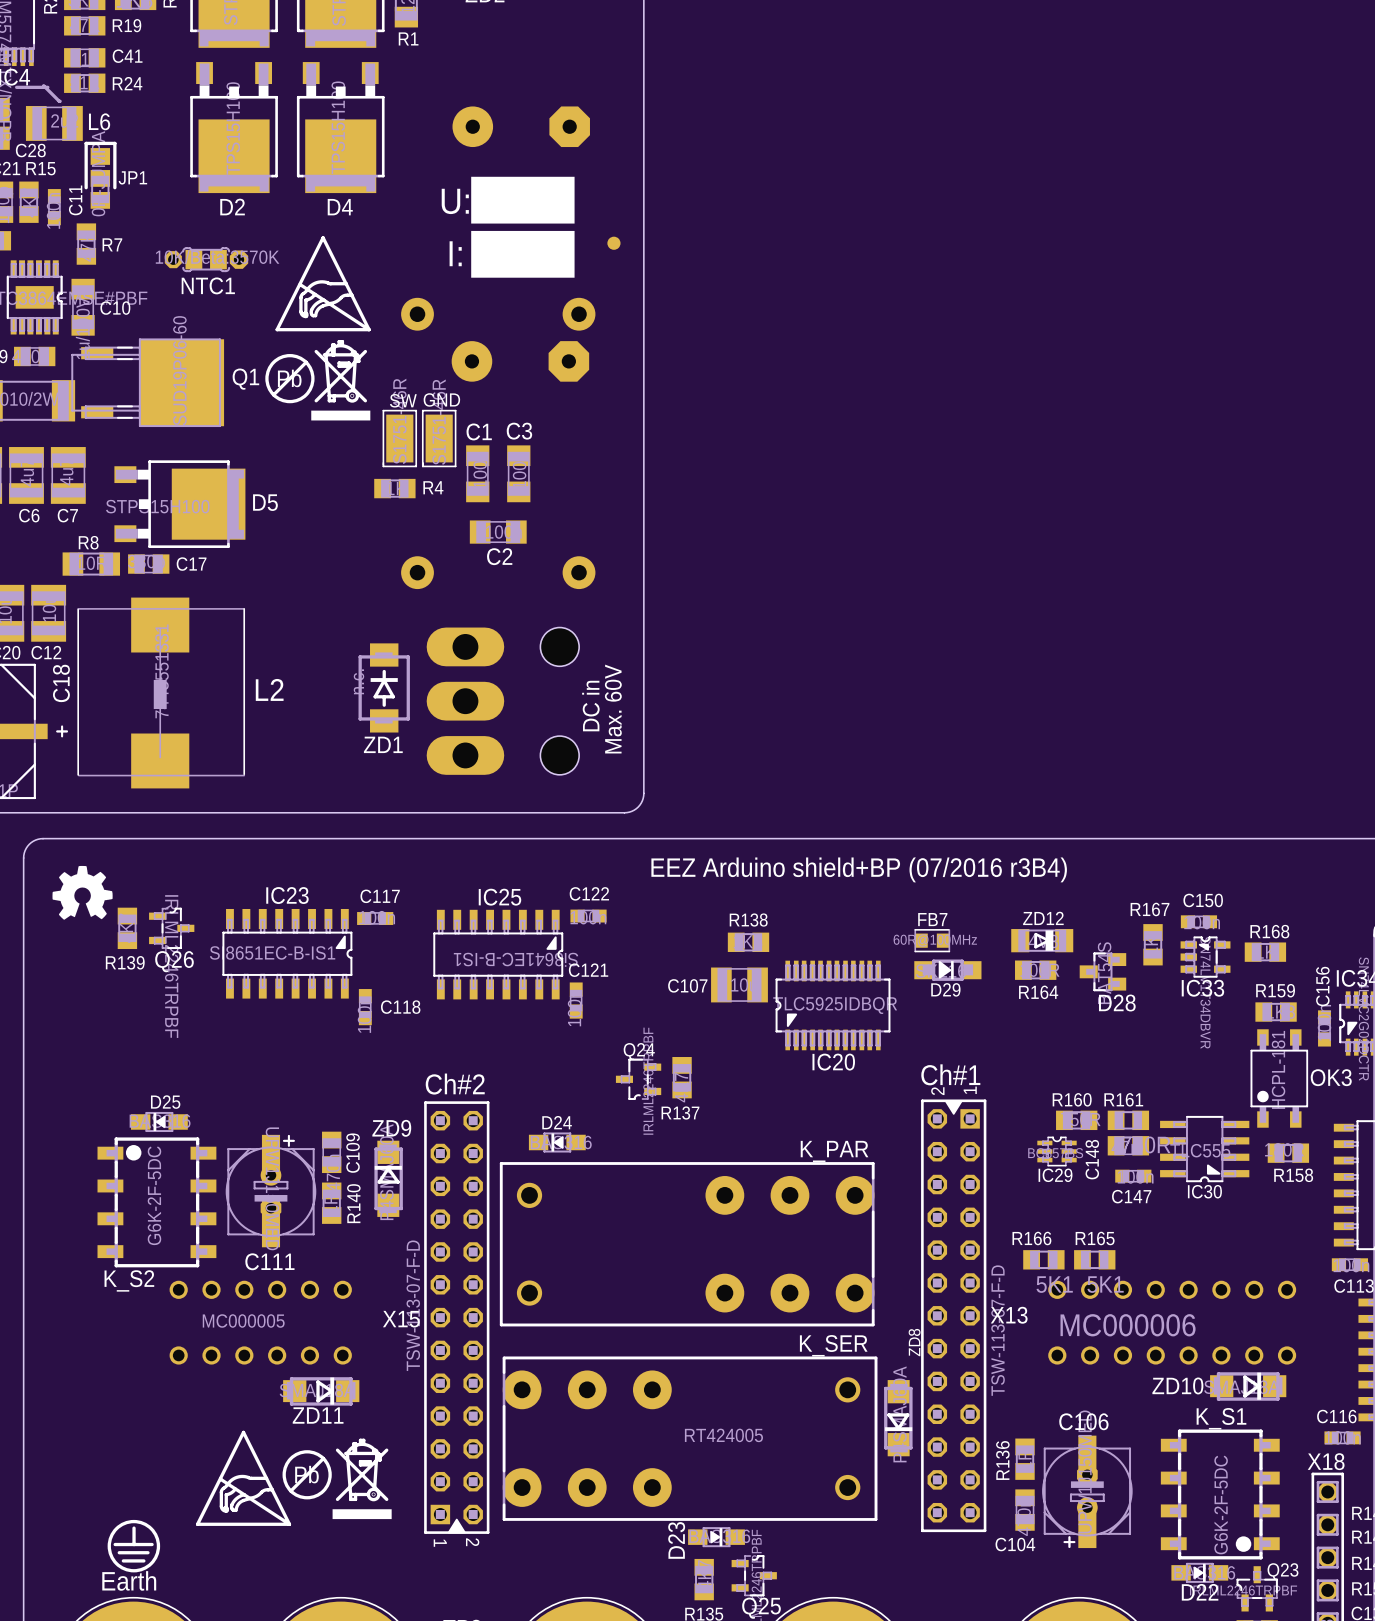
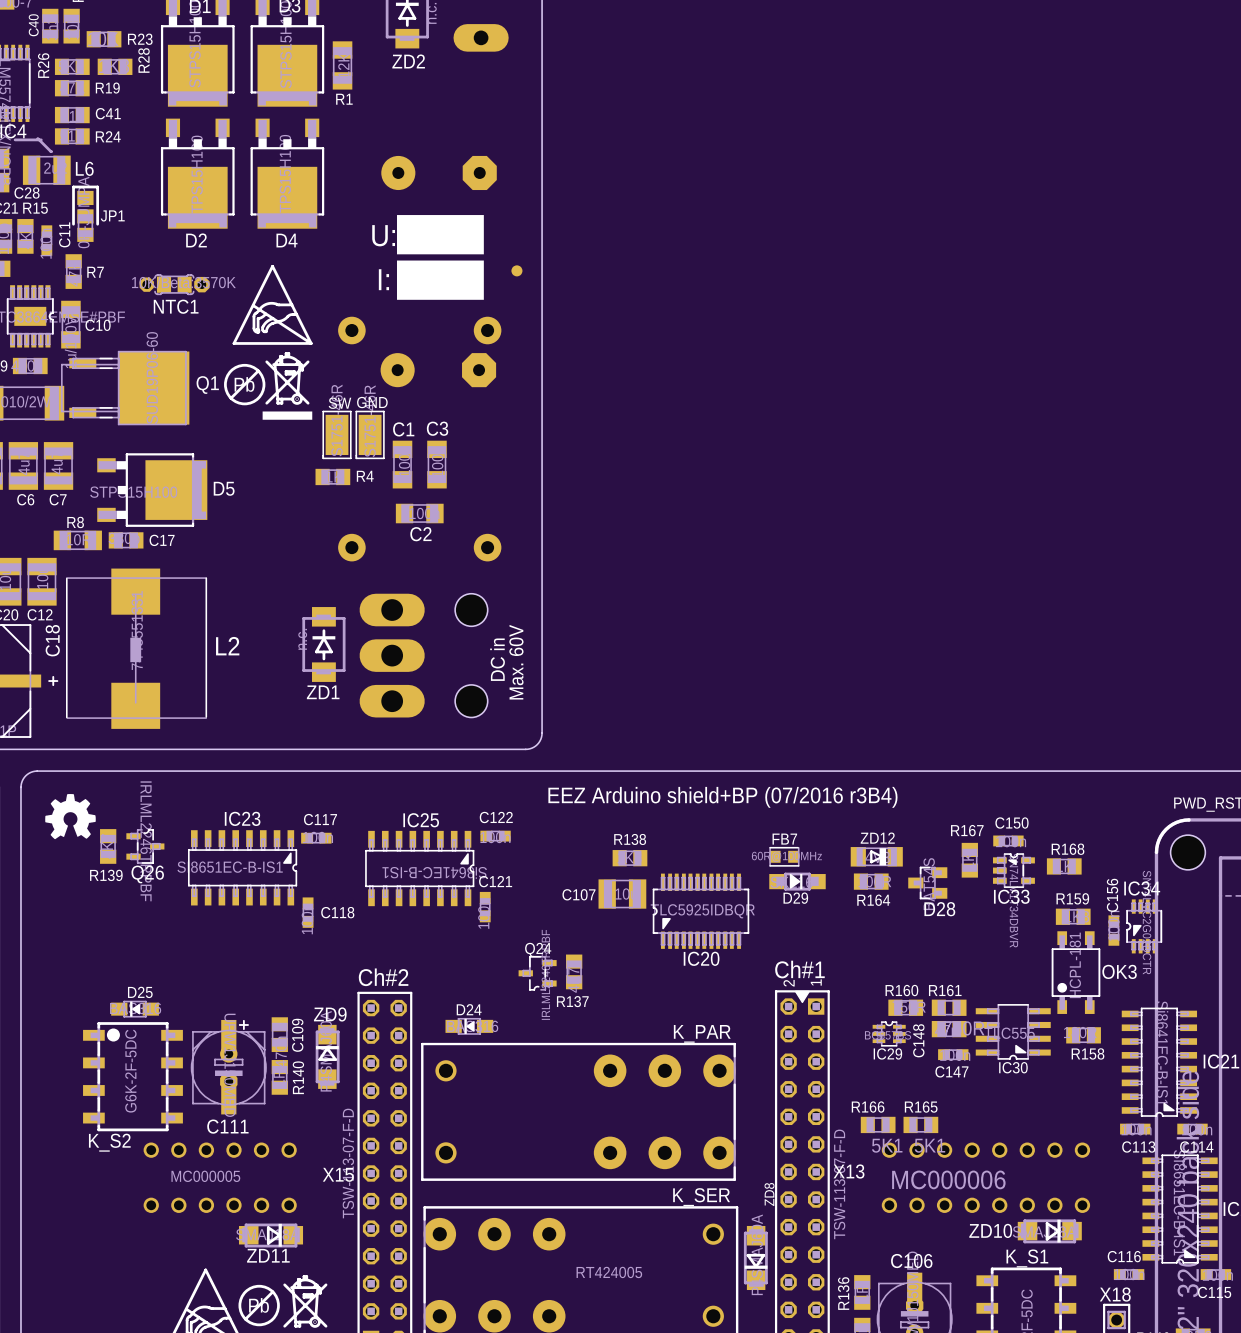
Q26 value position: IRLML2246TRPBF (171, 966) -> IRLML2246TRPBF (146, 841)

